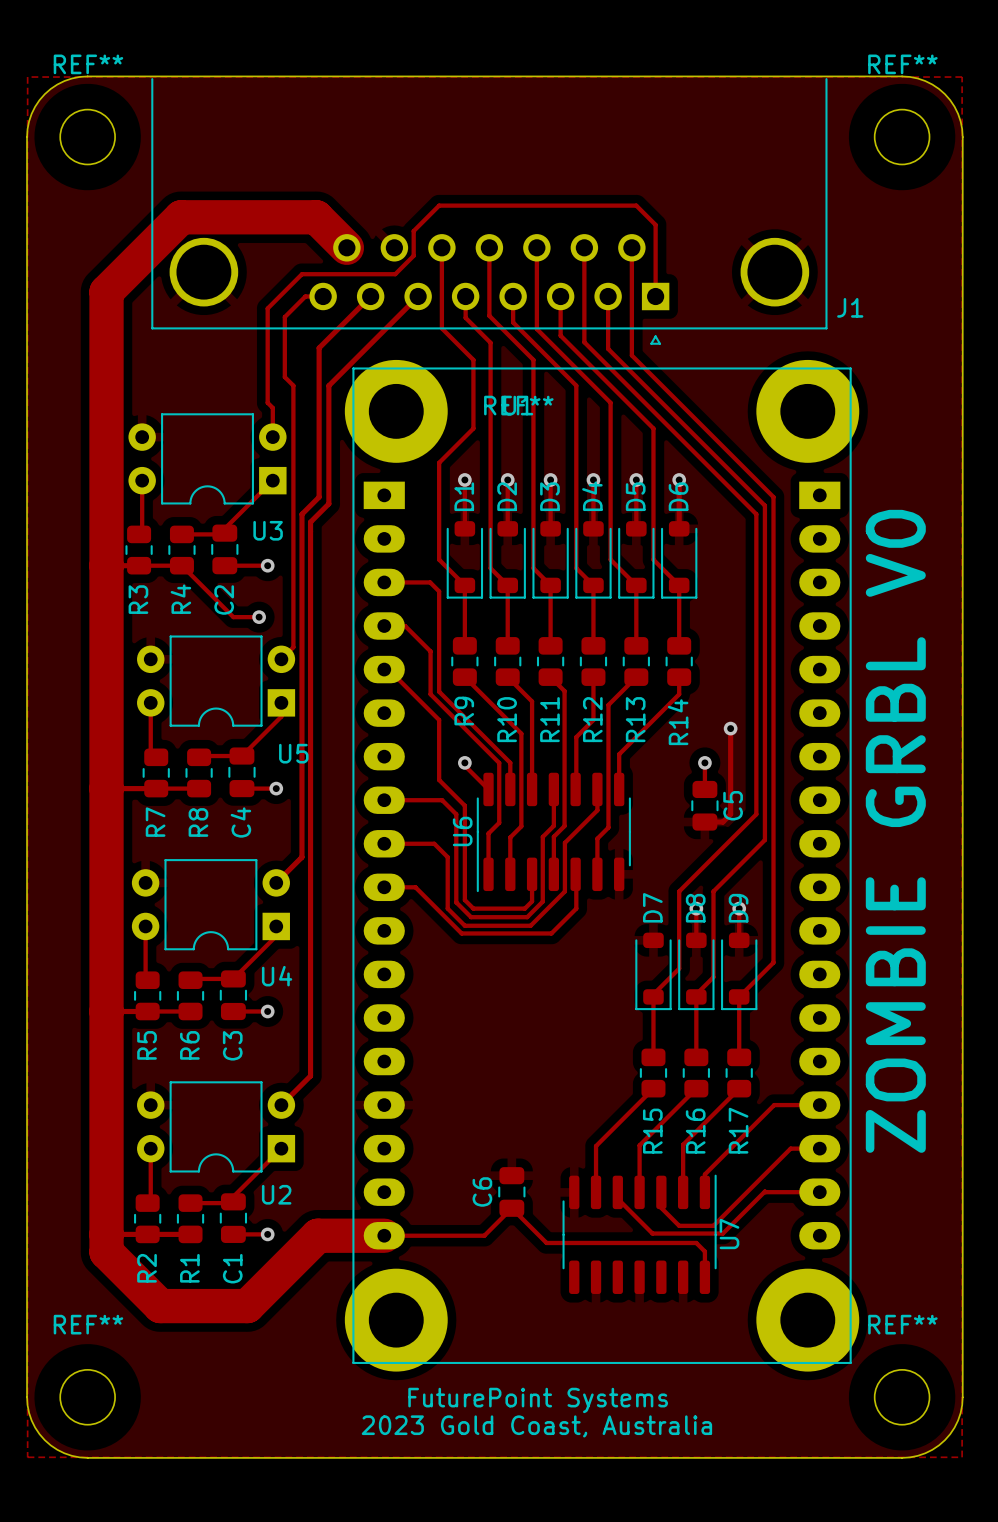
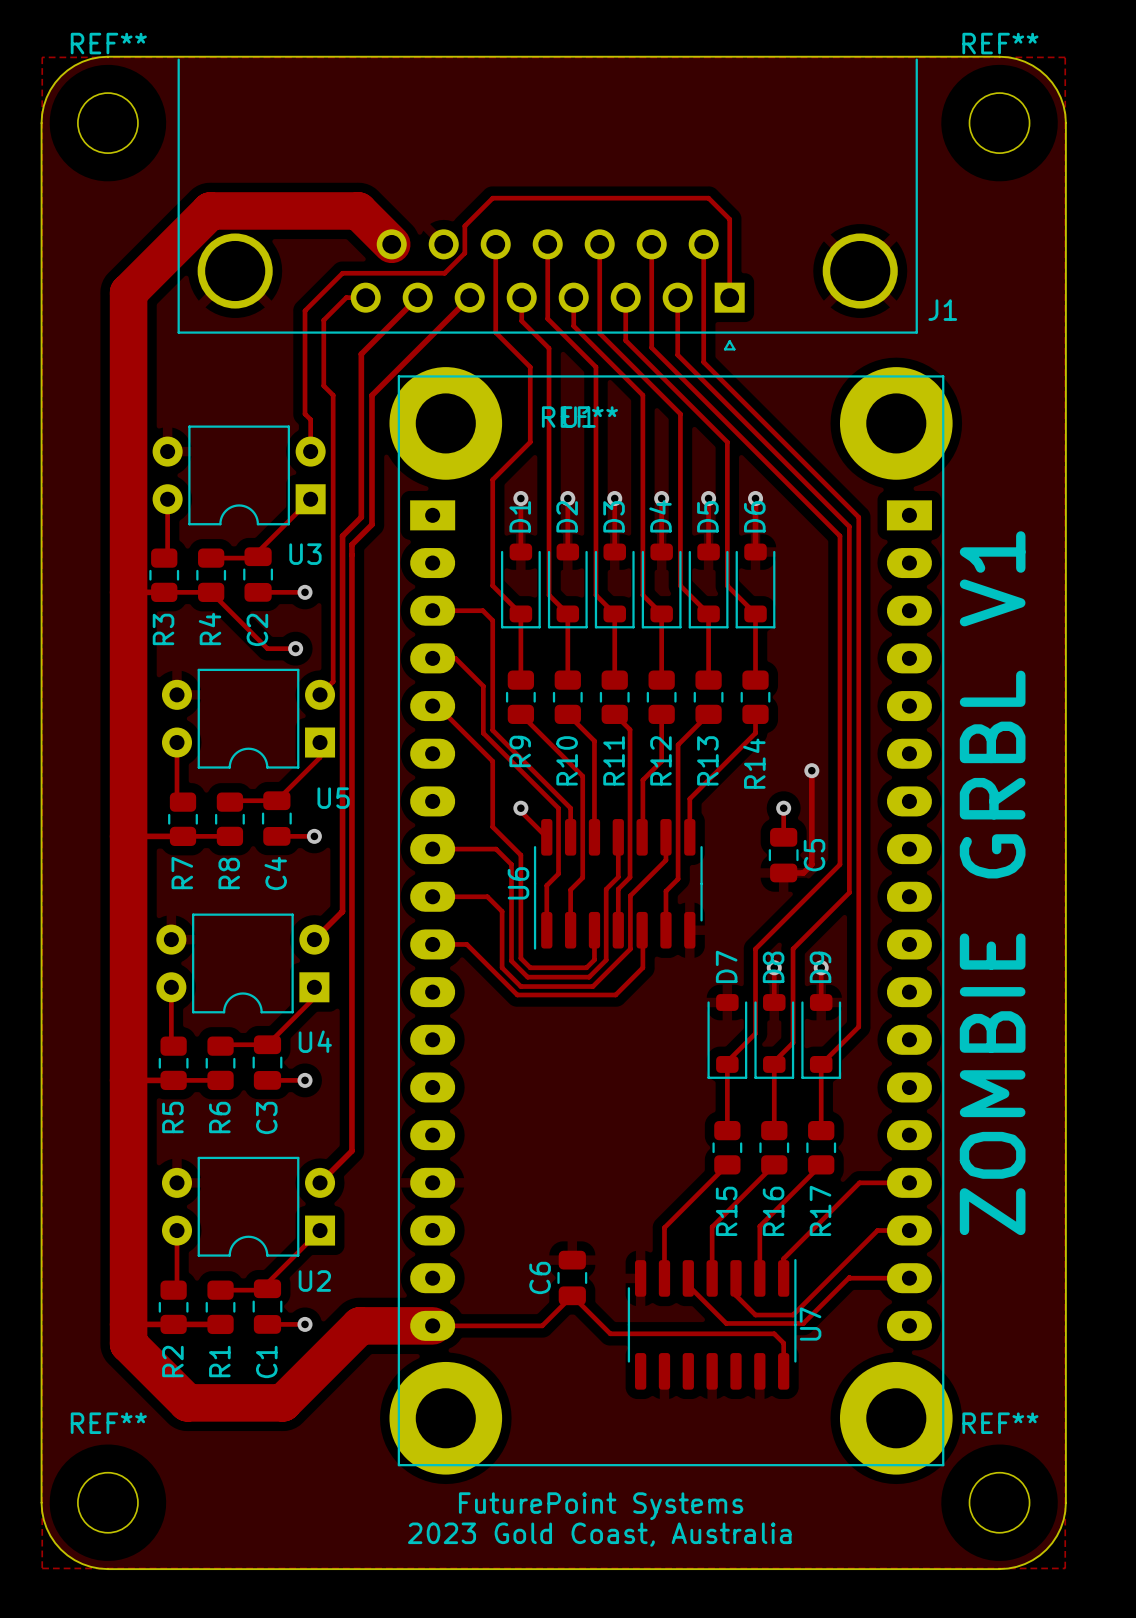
text: ZOMBIE GRBL V0 (895, 831) -> ZOMBIE GRBL V1 (992, 883)

